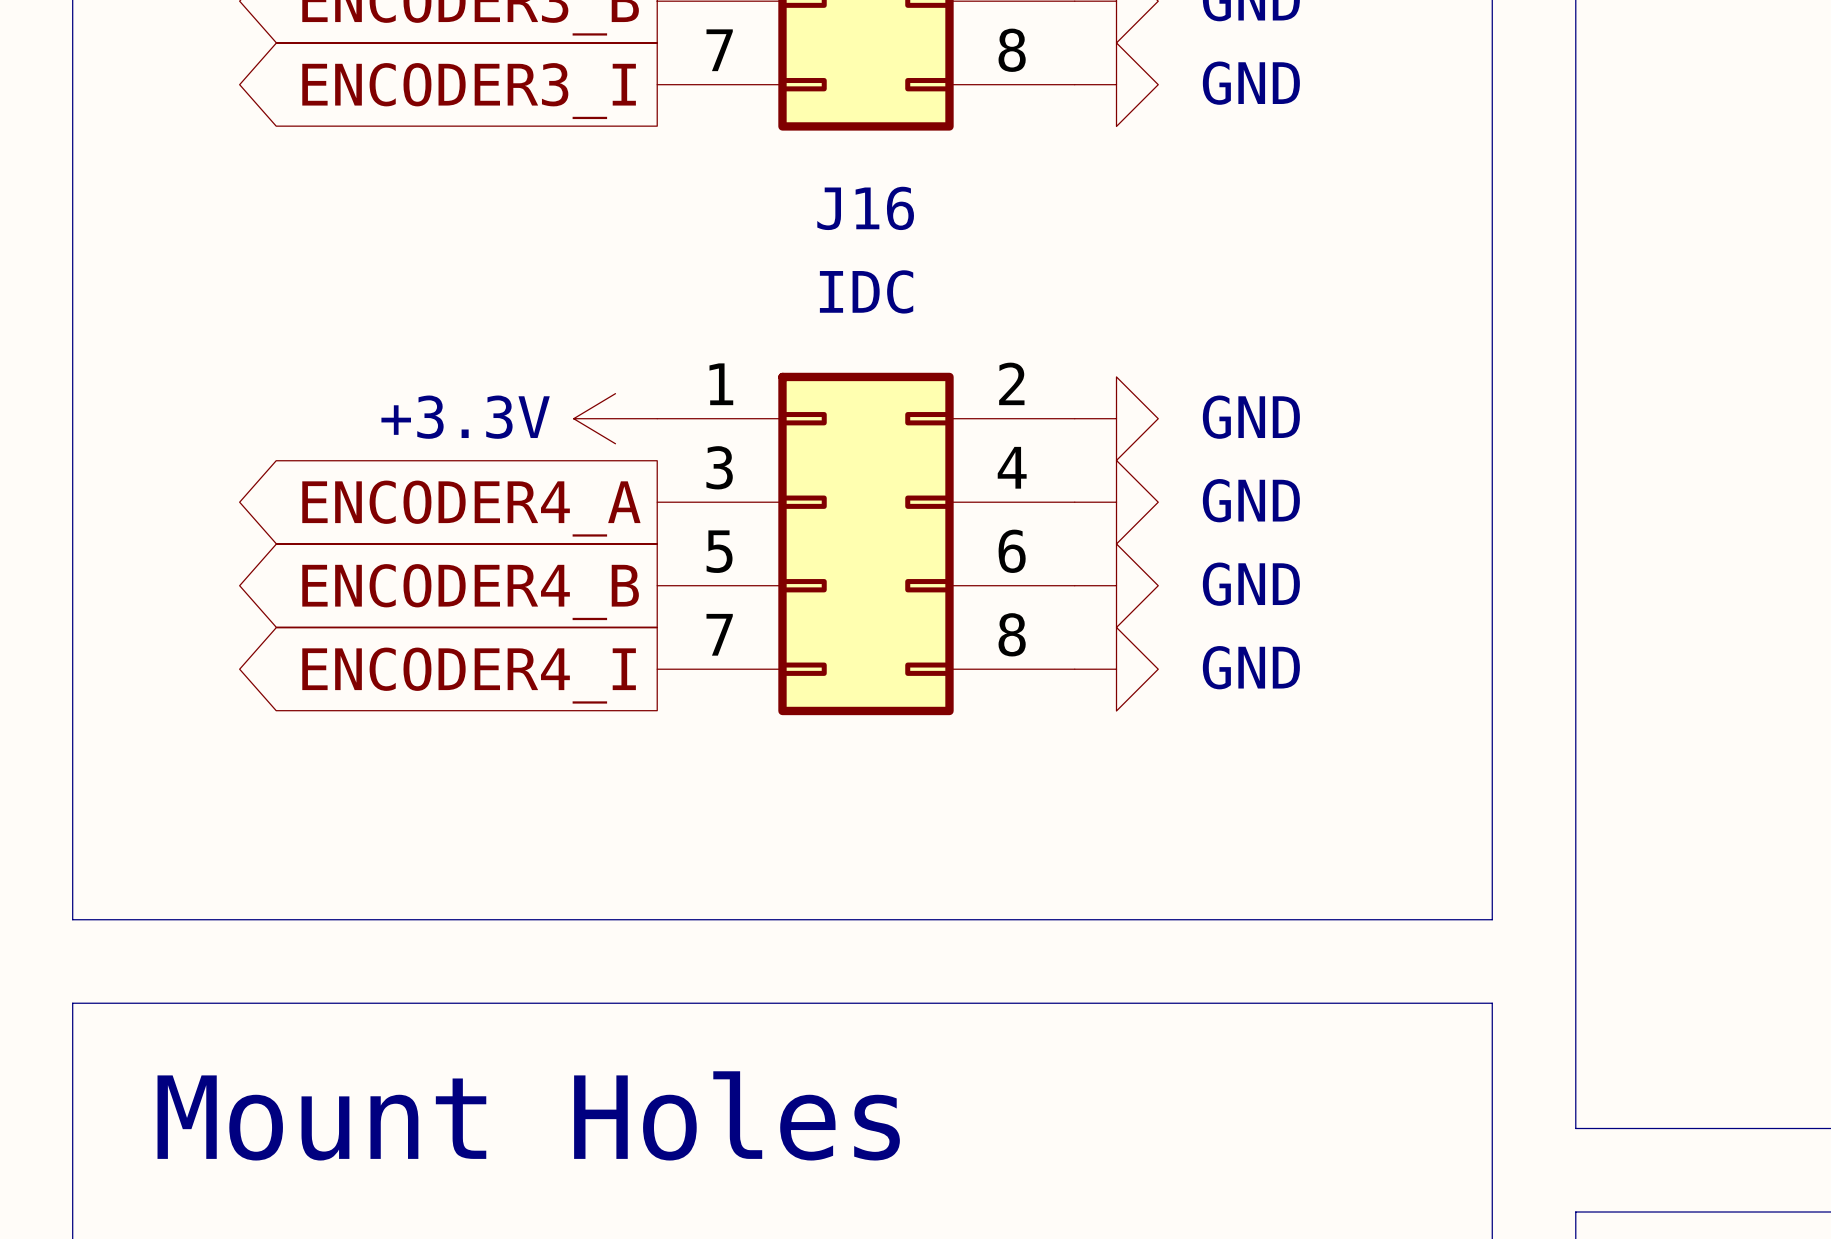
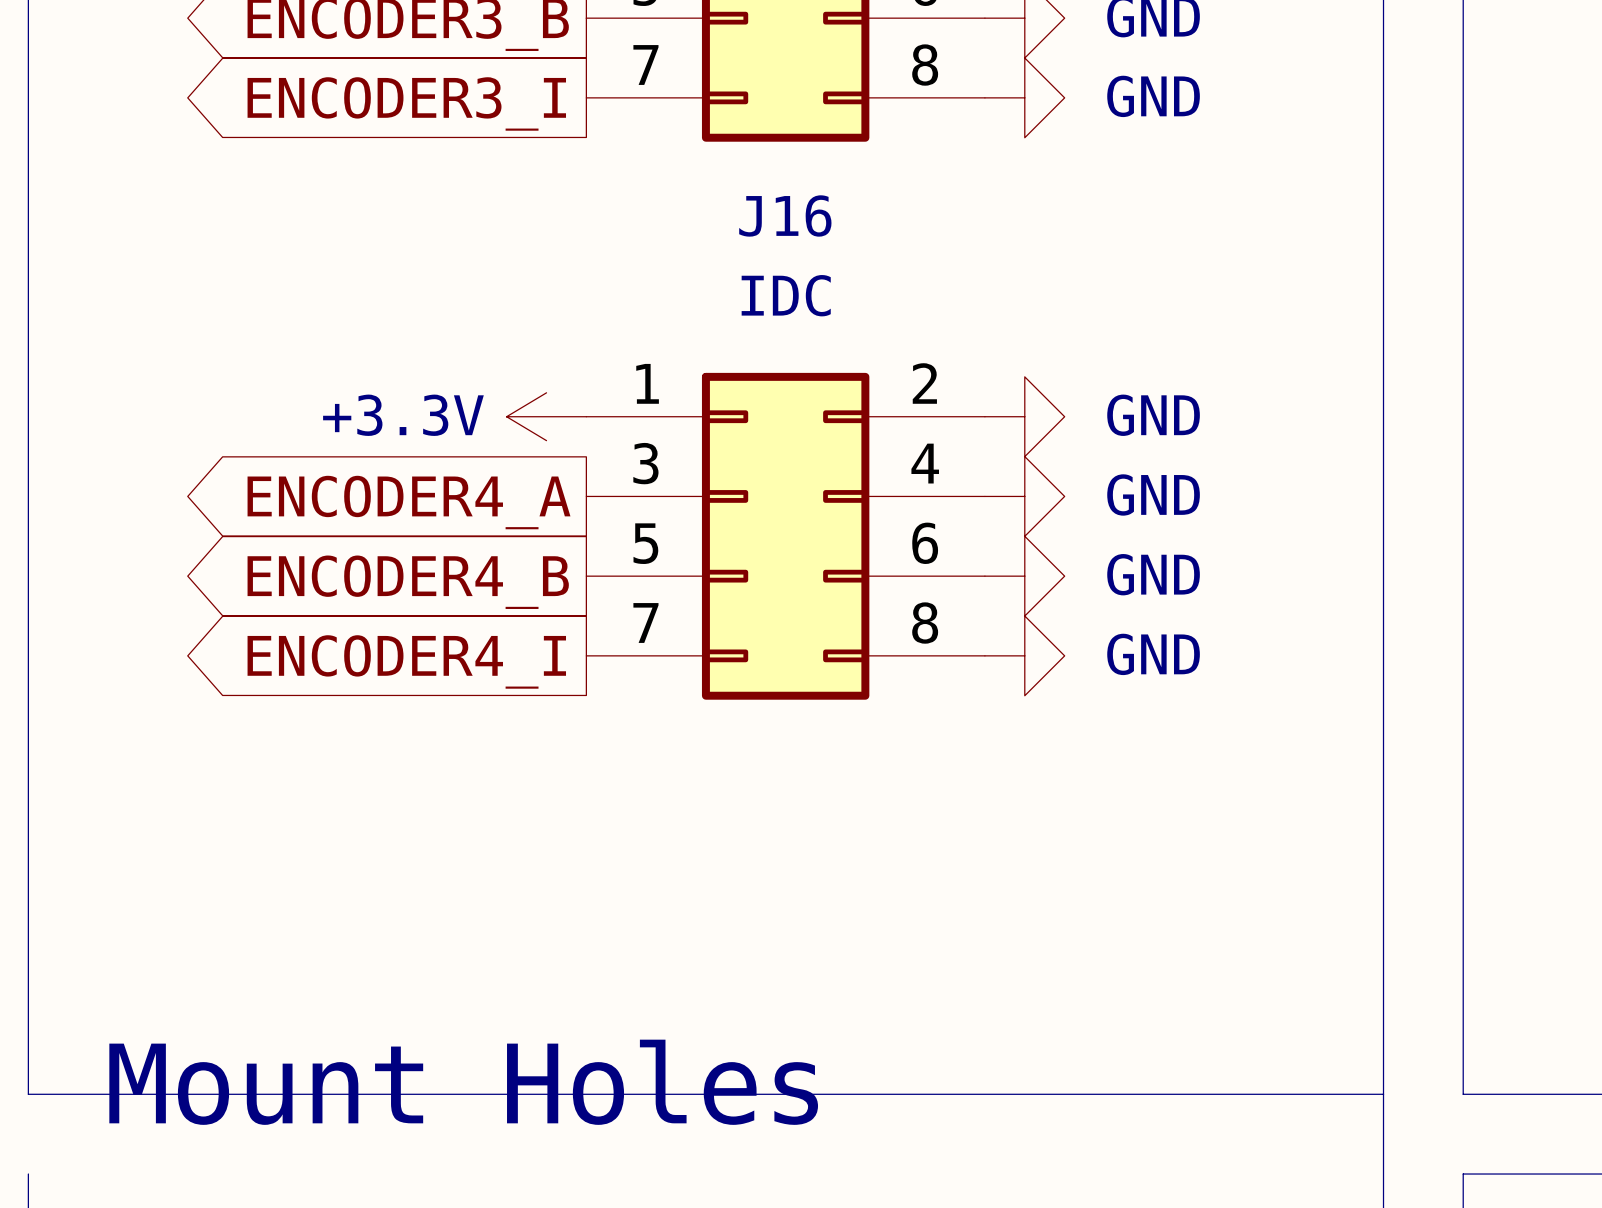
line: (72, 919) (1492, 919) -> (28, 895) (28, 974)
line: (72, 1003) (1492, 1003) -> (1383, 895) (1383, 974)
line: (72, 1128) (72, 1212) -> (28, 1094) (1383, 1094)

